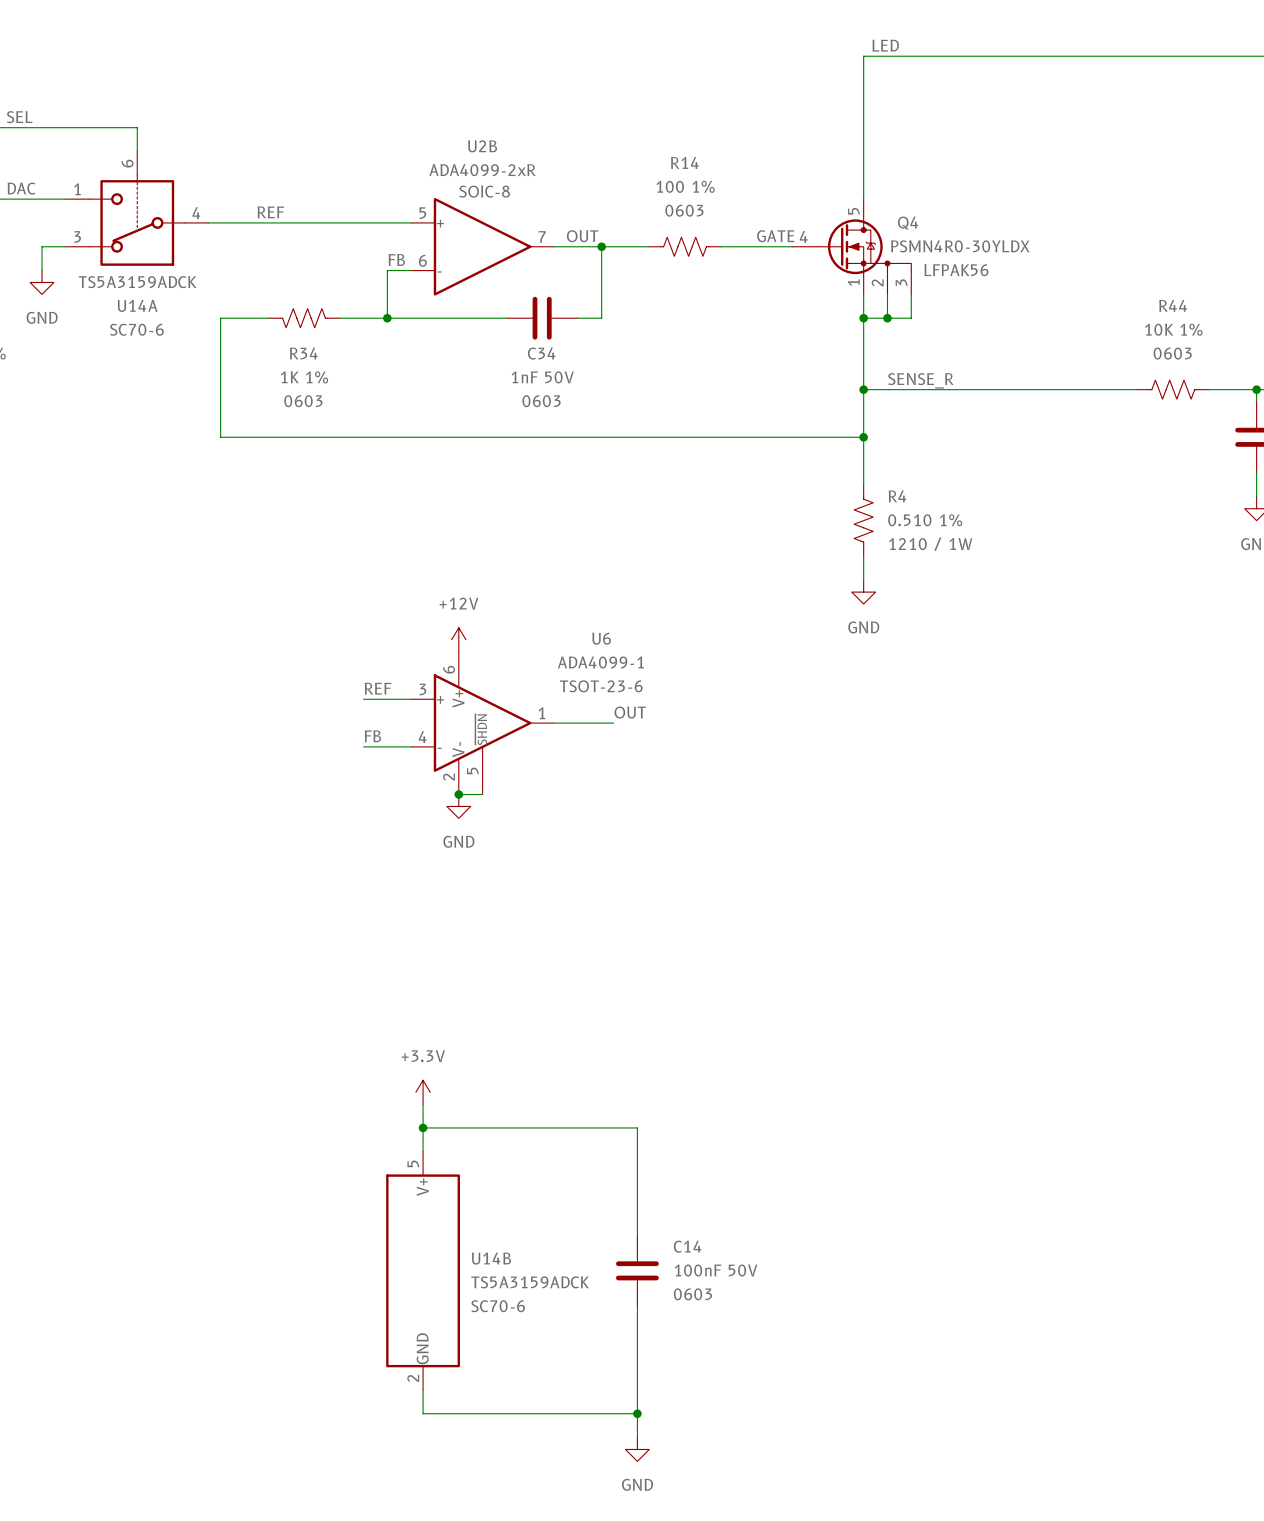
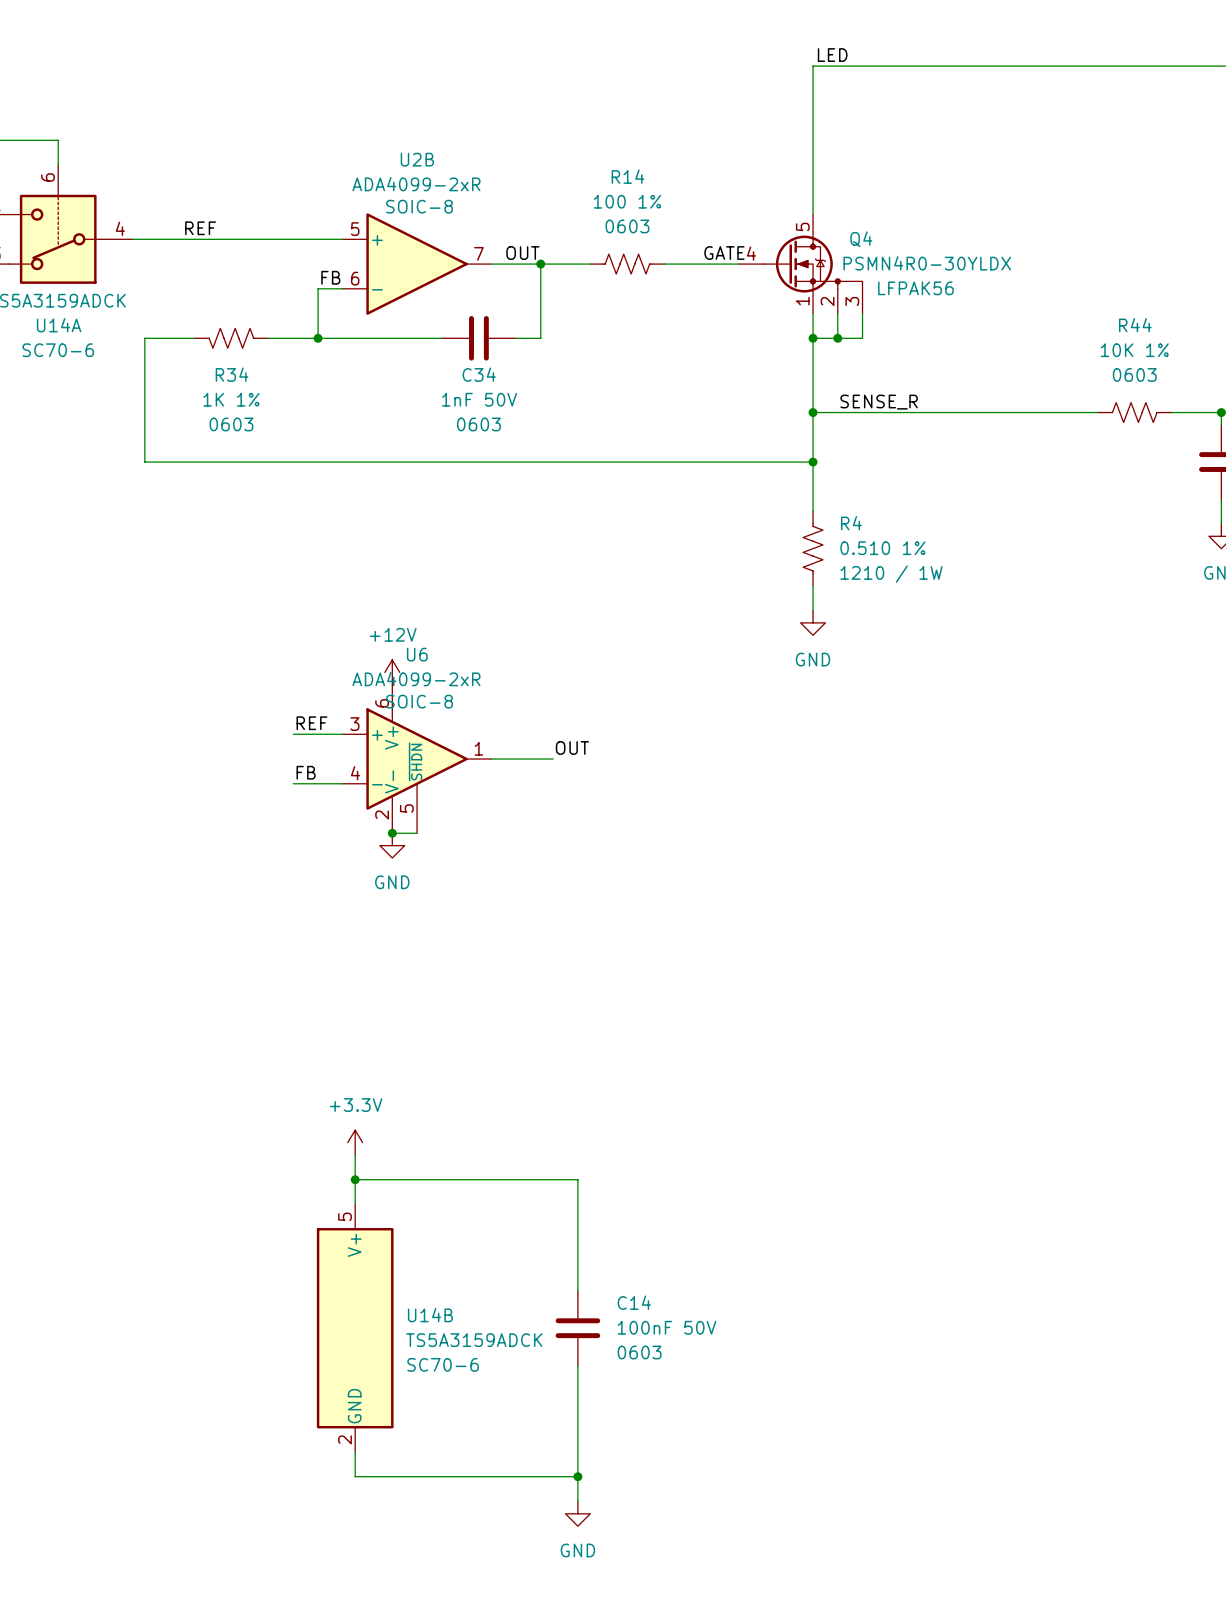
U6 name position: U6 (601, 638) -> U6 (417, 654)
U6 value: ADA4099-1 (600, 662) -> ADA4099-2xR (416, 679)
U6 text: TSOT-23-6 (601, 686) -> SOIC-8 (419, 701)

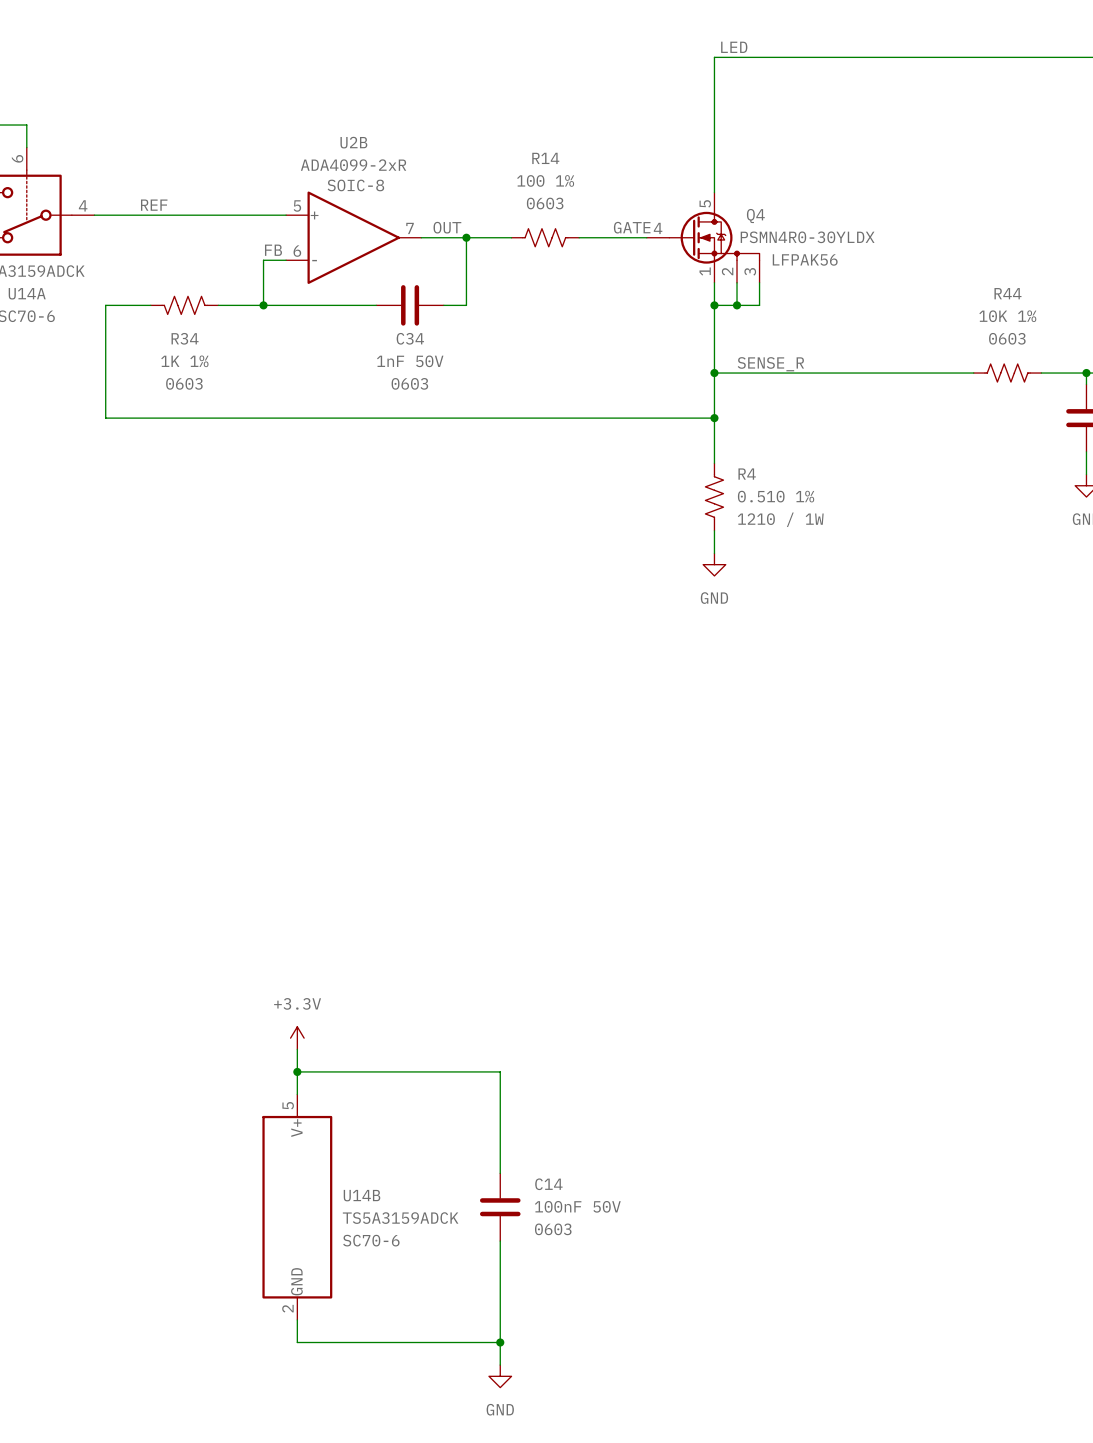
power symbol: +12V (392, 672) -> none
label: REF (311, 723) -> none
wire: (293, 734) (342, 734) -> none
label: OUT (572, 747) -> none
U6: ADA4099-2xR (417, 759) -> none
wire: (491, 759) (553, 759) -> none
label: FB (306, 772) -> none
wire: (293, 783) (342, 783) -> none
wire: (392, 833) (417, 833) -> none
junction: (392, 833) -> none
power symbol: GND (392, 845) -> none

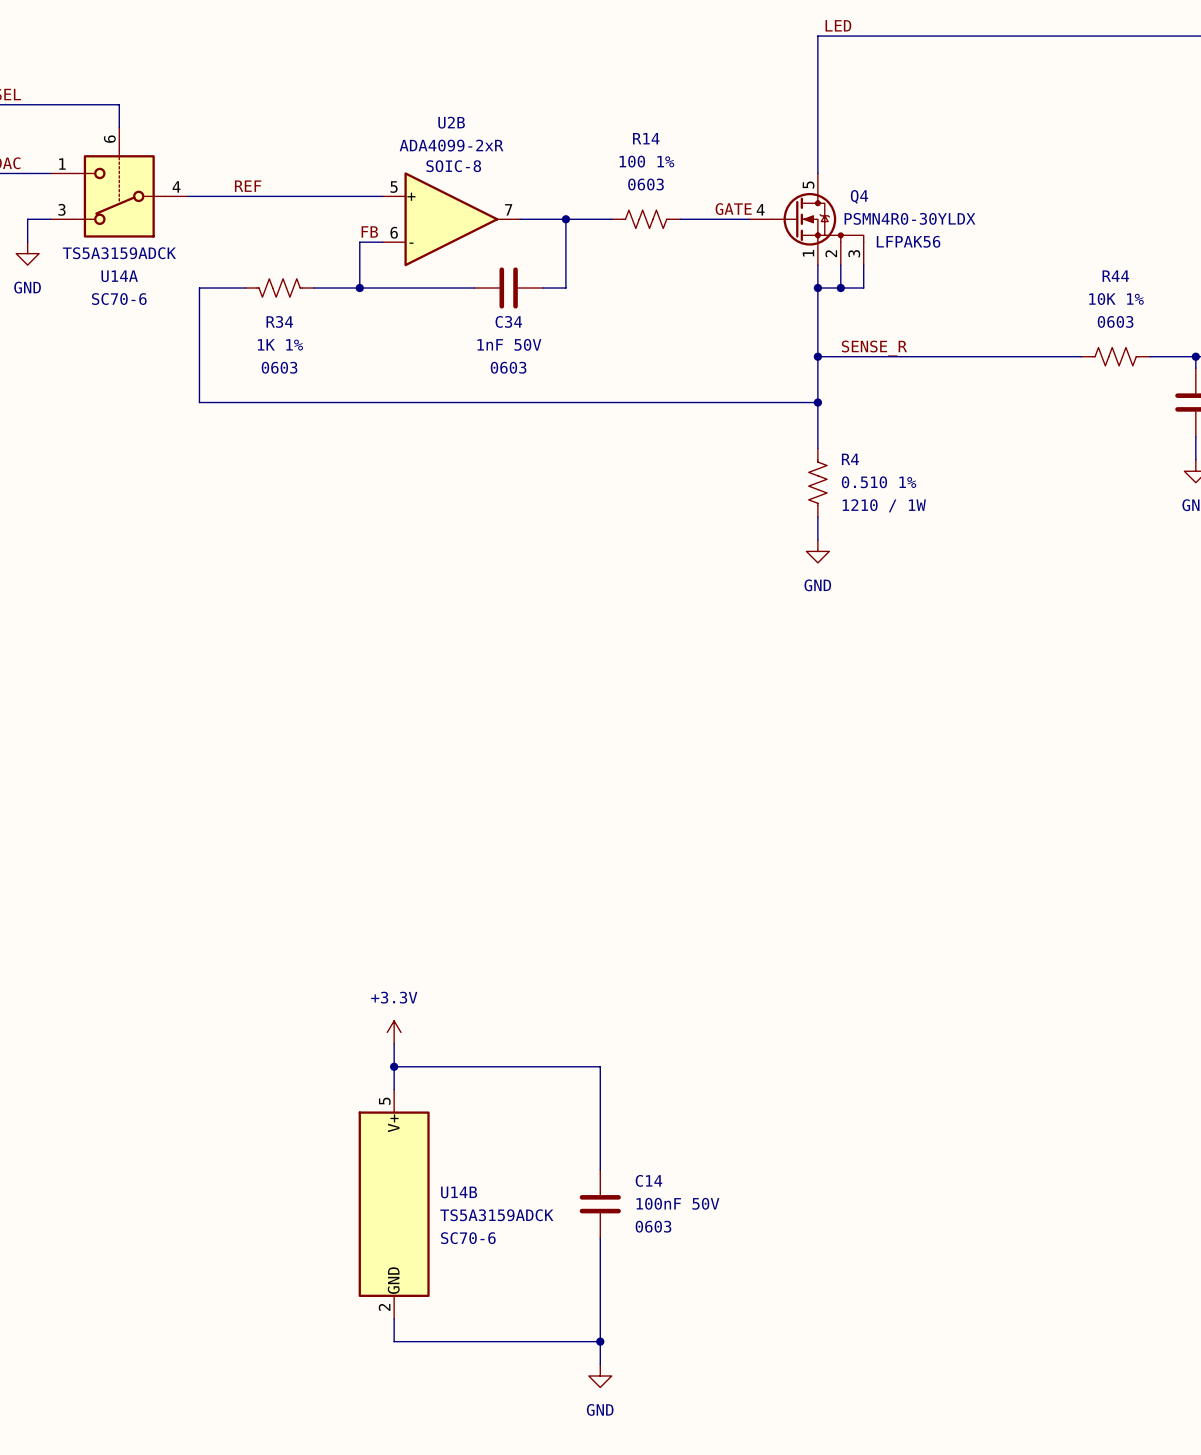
label: OUT (447, 227) -> none

